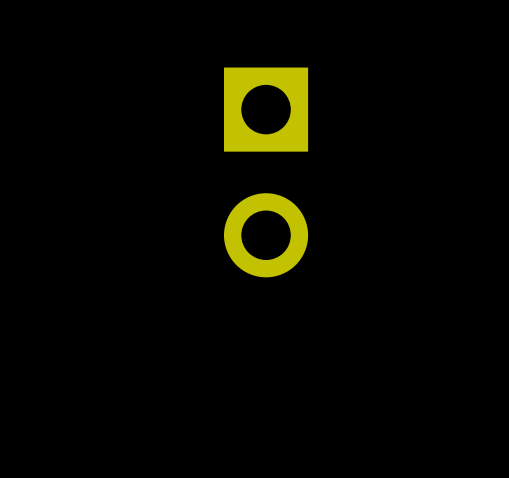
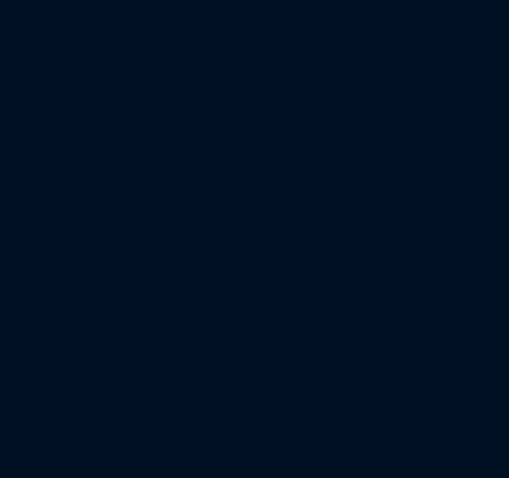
part: (266, 172) -> none

